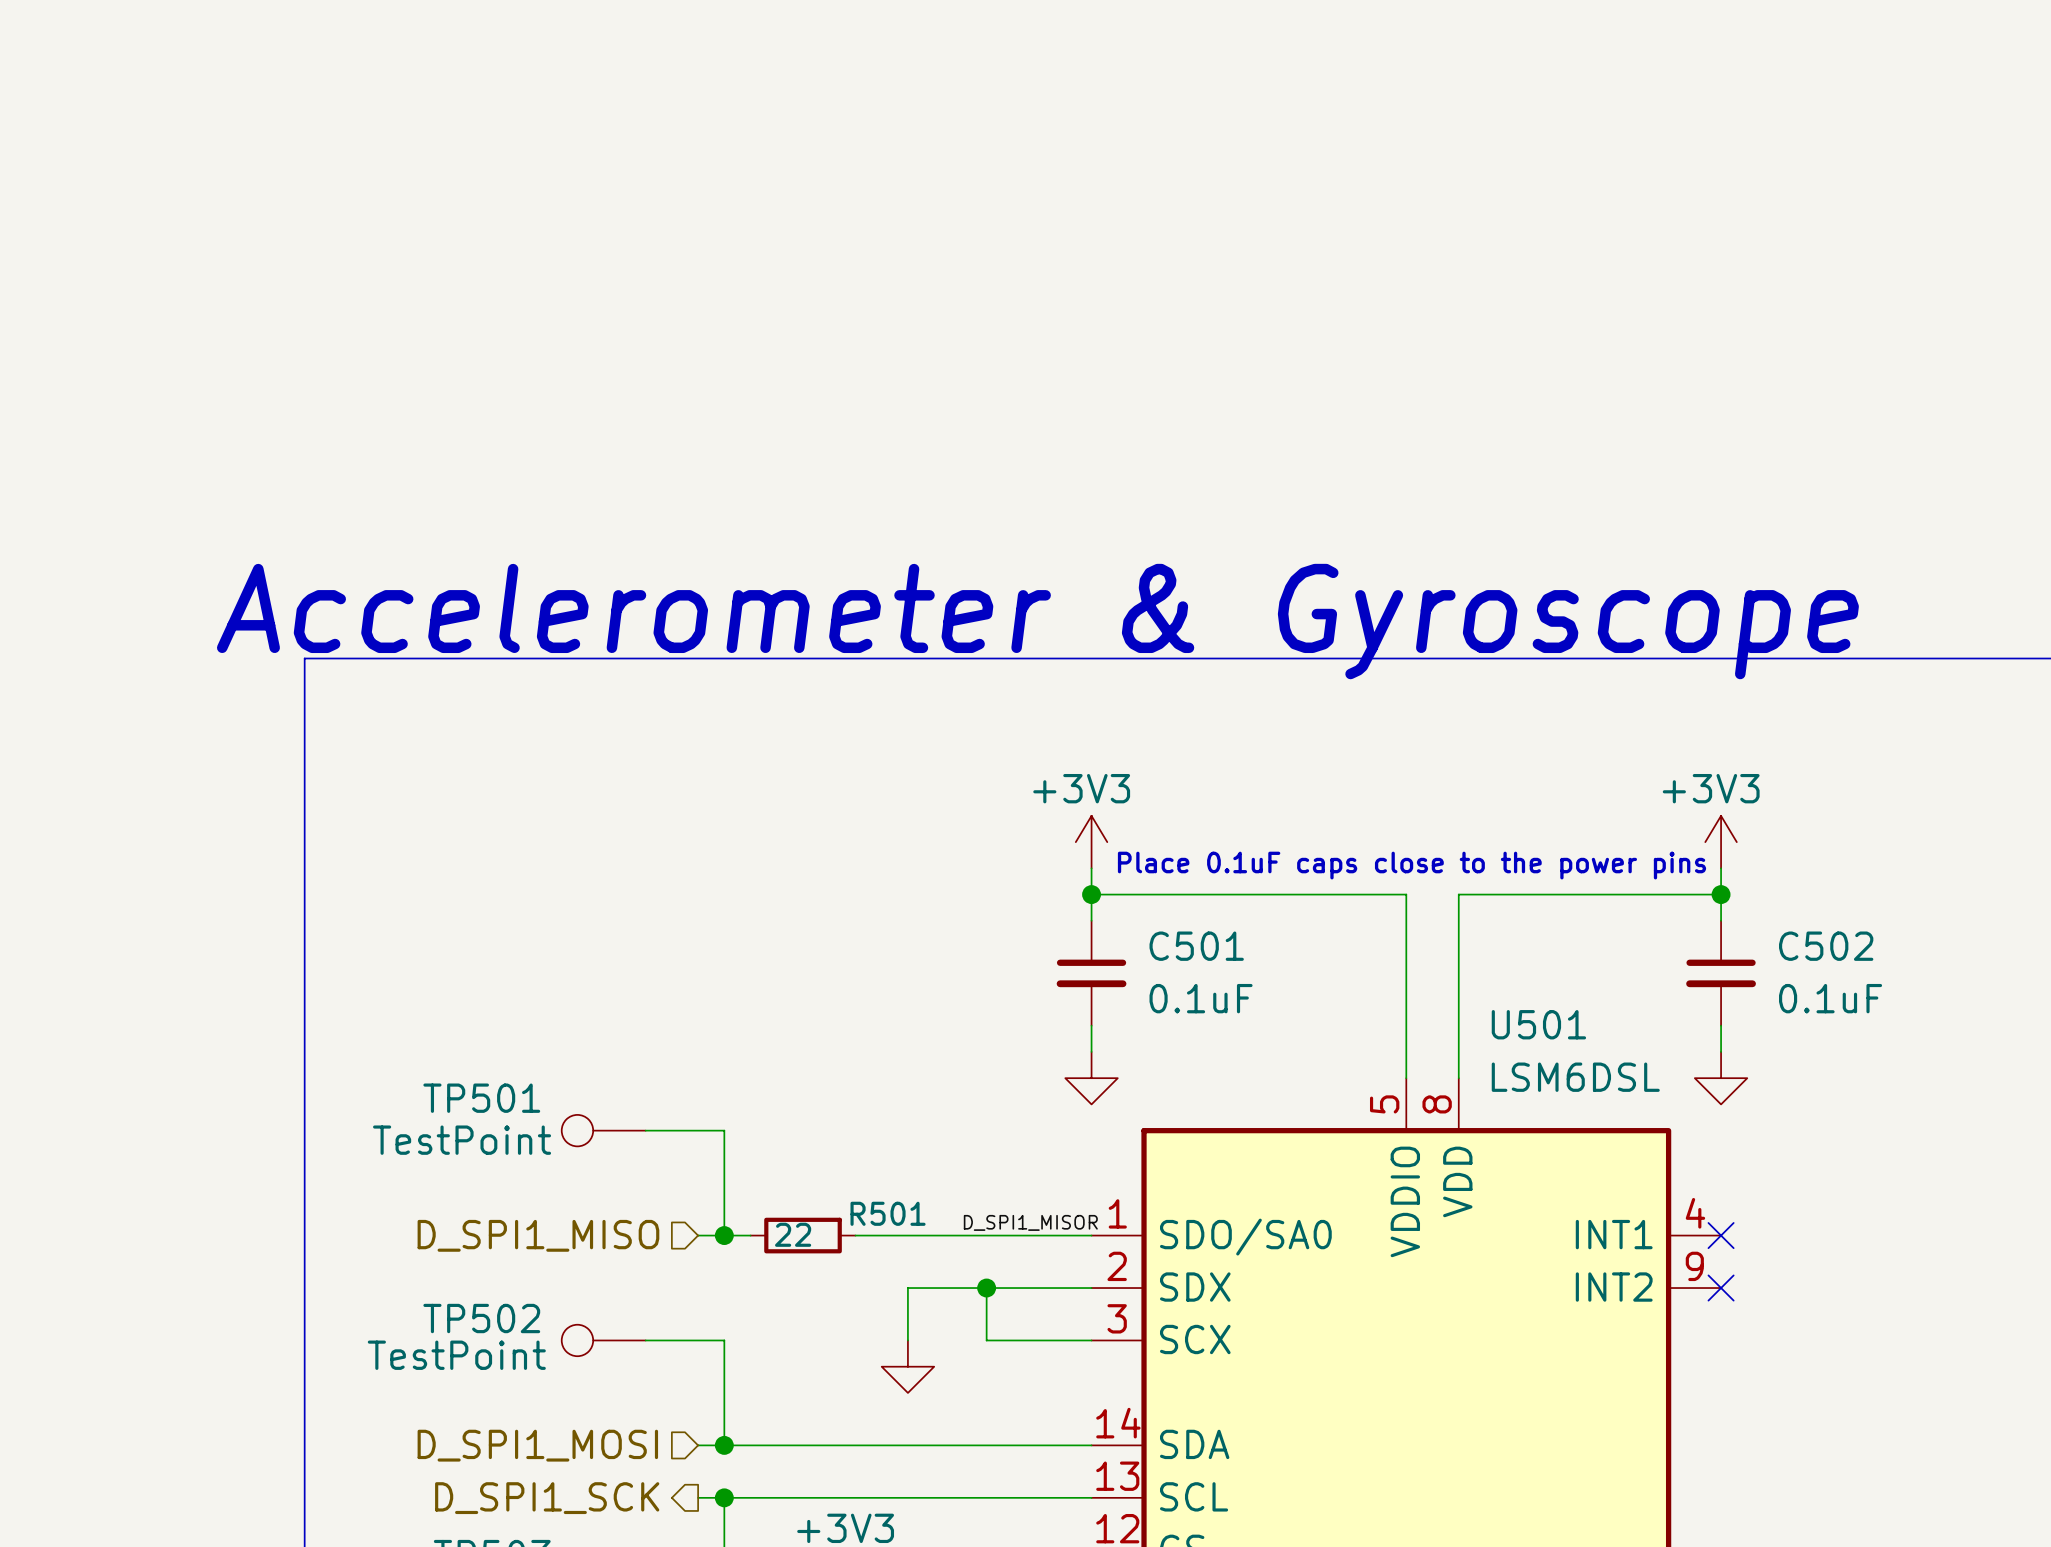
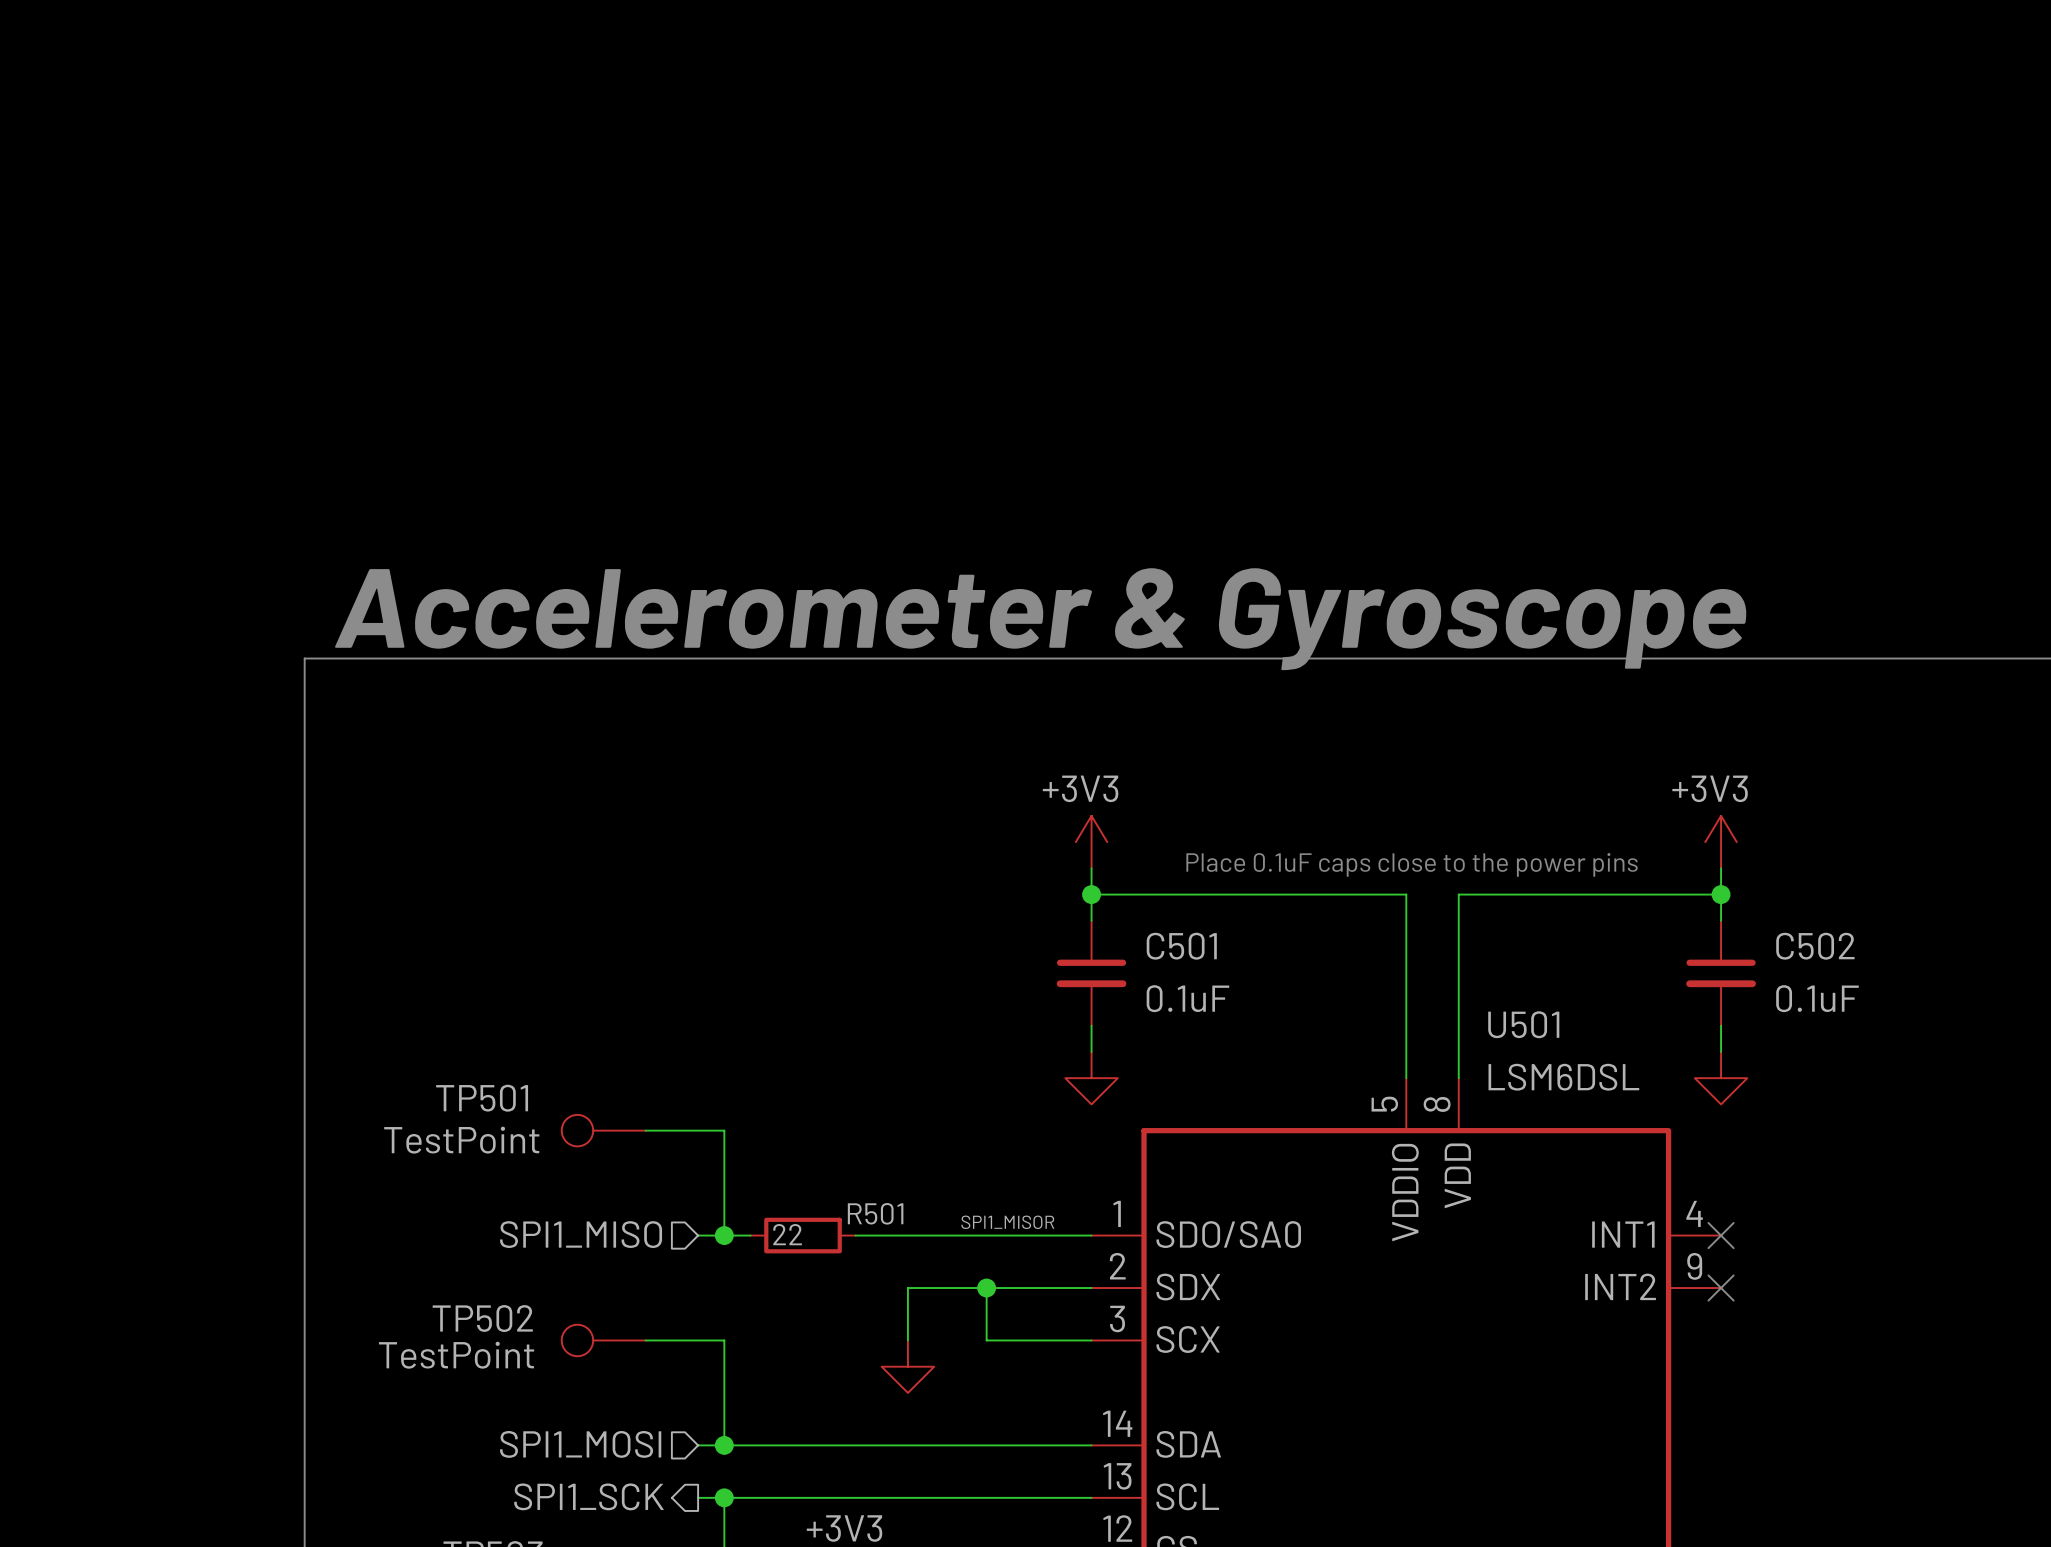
label: D_SPI1_MISOR (1030, 1222) -> SPI1_MISOR (1007, 1222)
hierarchical label: D_SPI1_MISO (538, 1235) -> SPI1_MISO (581, 1234)
hierarchical label: D_SPI1_MOSI (537, 1445) -> SPI1_MOSI (580, 1444)
hierarchical label: D_SPI1_SCK (547, 1498) -> SPI1_SCK (588, 1496)

